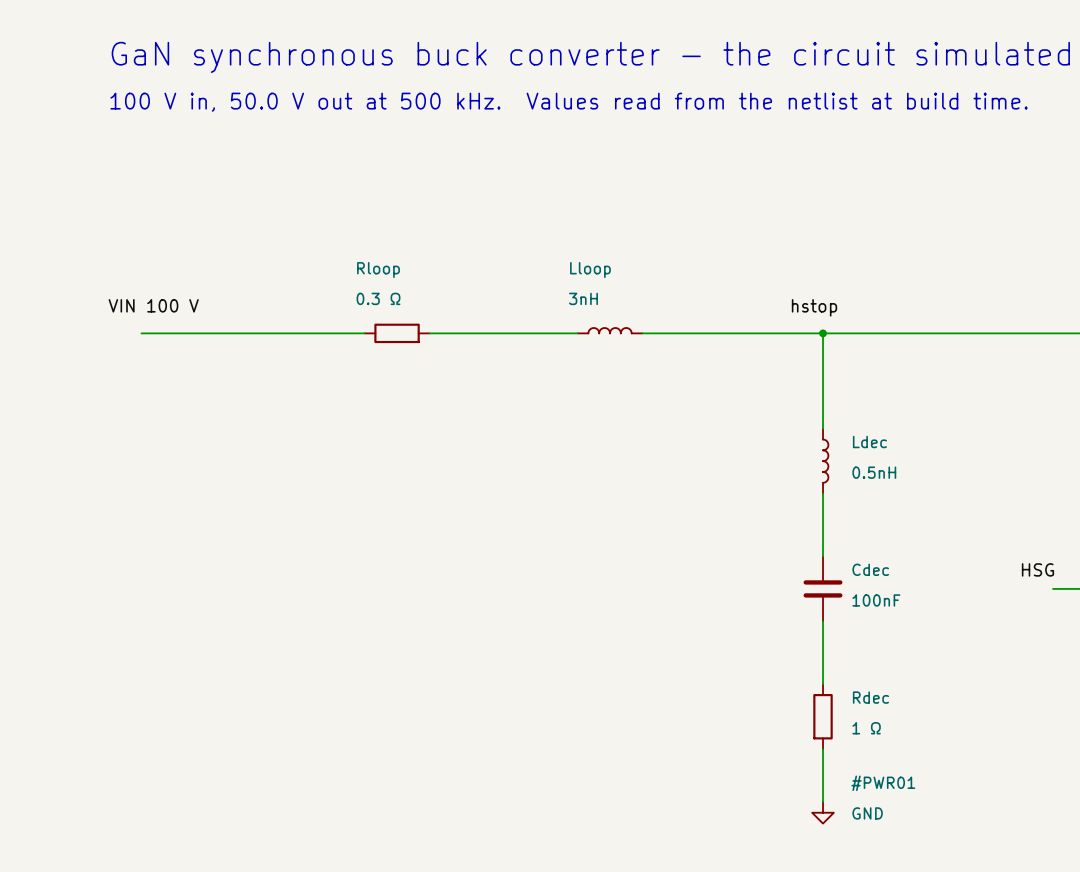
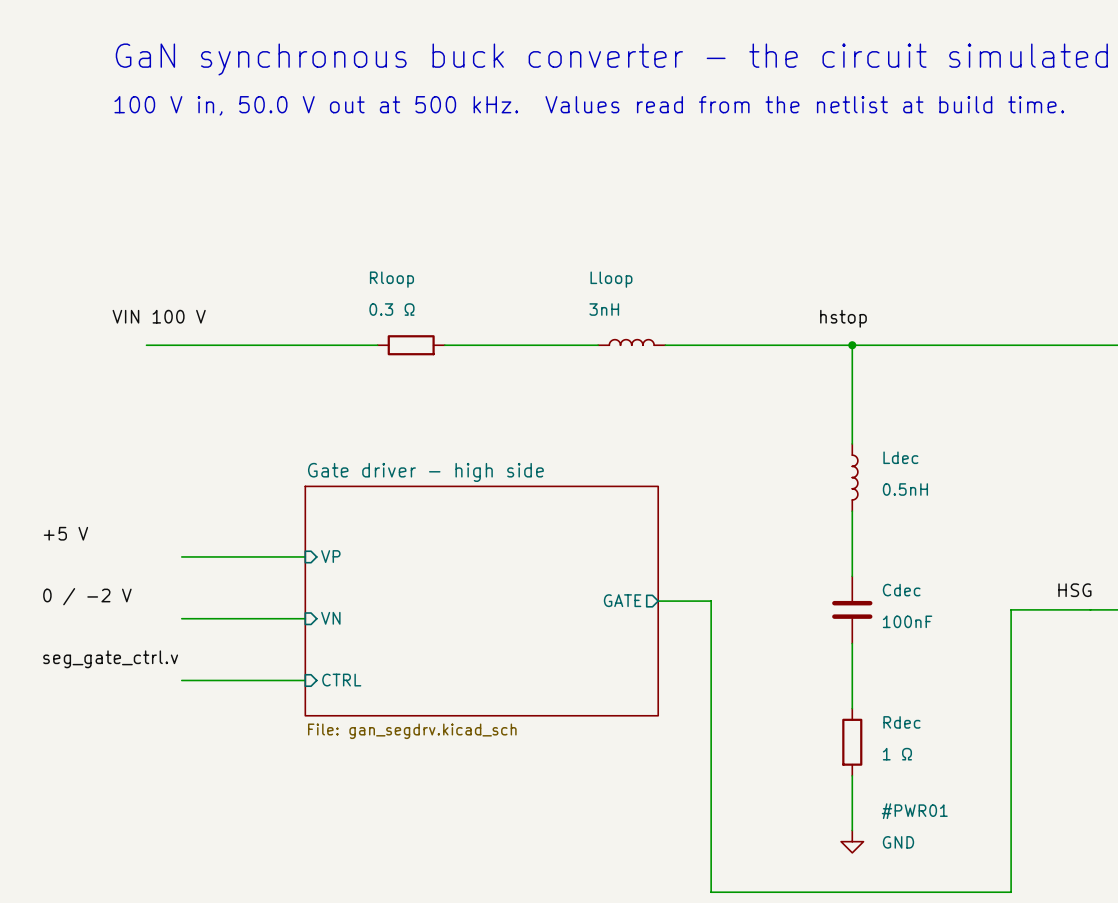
label: none -> +5 V (65, 533)
wire: none -> (181, 556) (305, 556)
sheet pin: none -> VP (330, 556)
label: none -> 0 / -2 V (87, 596)
sheet Gate driver - high side: none -> File: gan_segdrv.kicad_sch (481, 601)
sheet pin: none -> GATE (622, 600)
wire: none -> (658, 601) (711, 601) (711, 892) (1011, 892) (1011, 609) (1090, 609)
wire: none -> (181, 618) (305, 618)
sheet pin: none -> VN (330, 618)
label: none -> seg_gate_ctrl.v (110, 659)
sheet pin: none -> CTRL (341, 680)
wire: none -> (181, 680) (305, 680)

